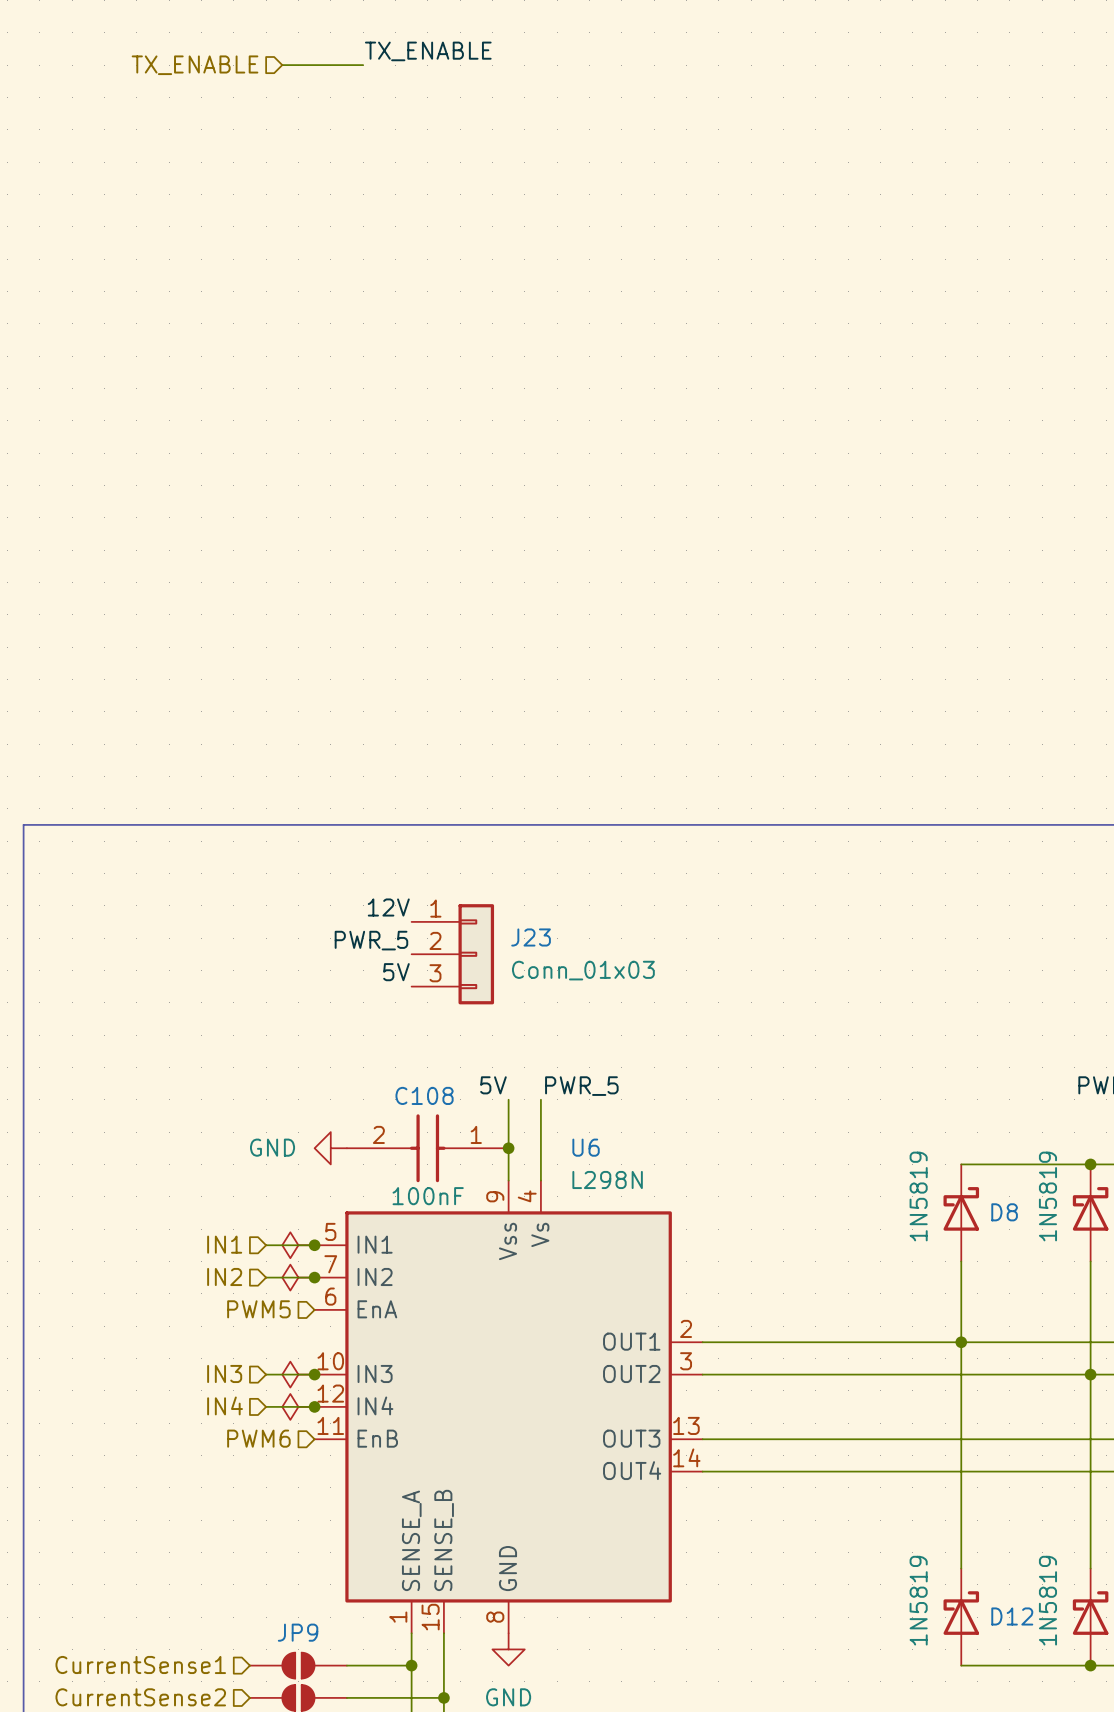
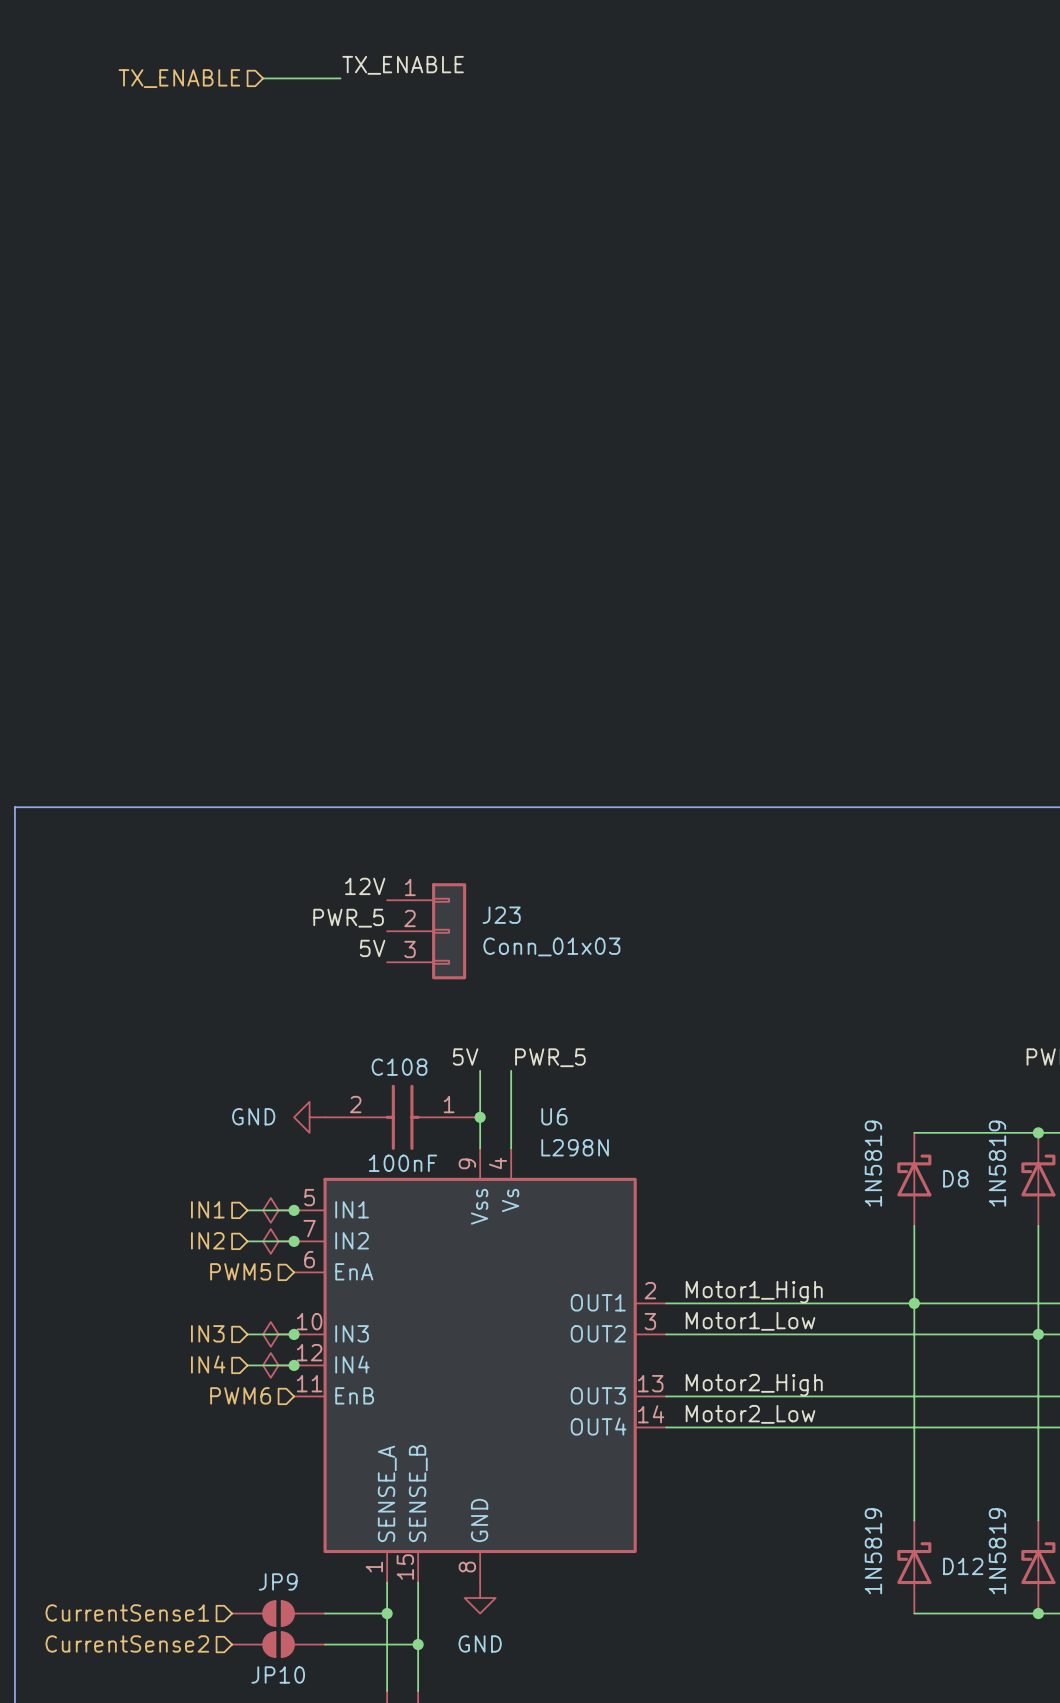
label: none -> Motor1_High (754, 1292)
label: none -> Motor1_Low (750, 1321)
label: none -> Motor2_High (754, 1385)
label: none -> Motor2_Low (750, 1414)

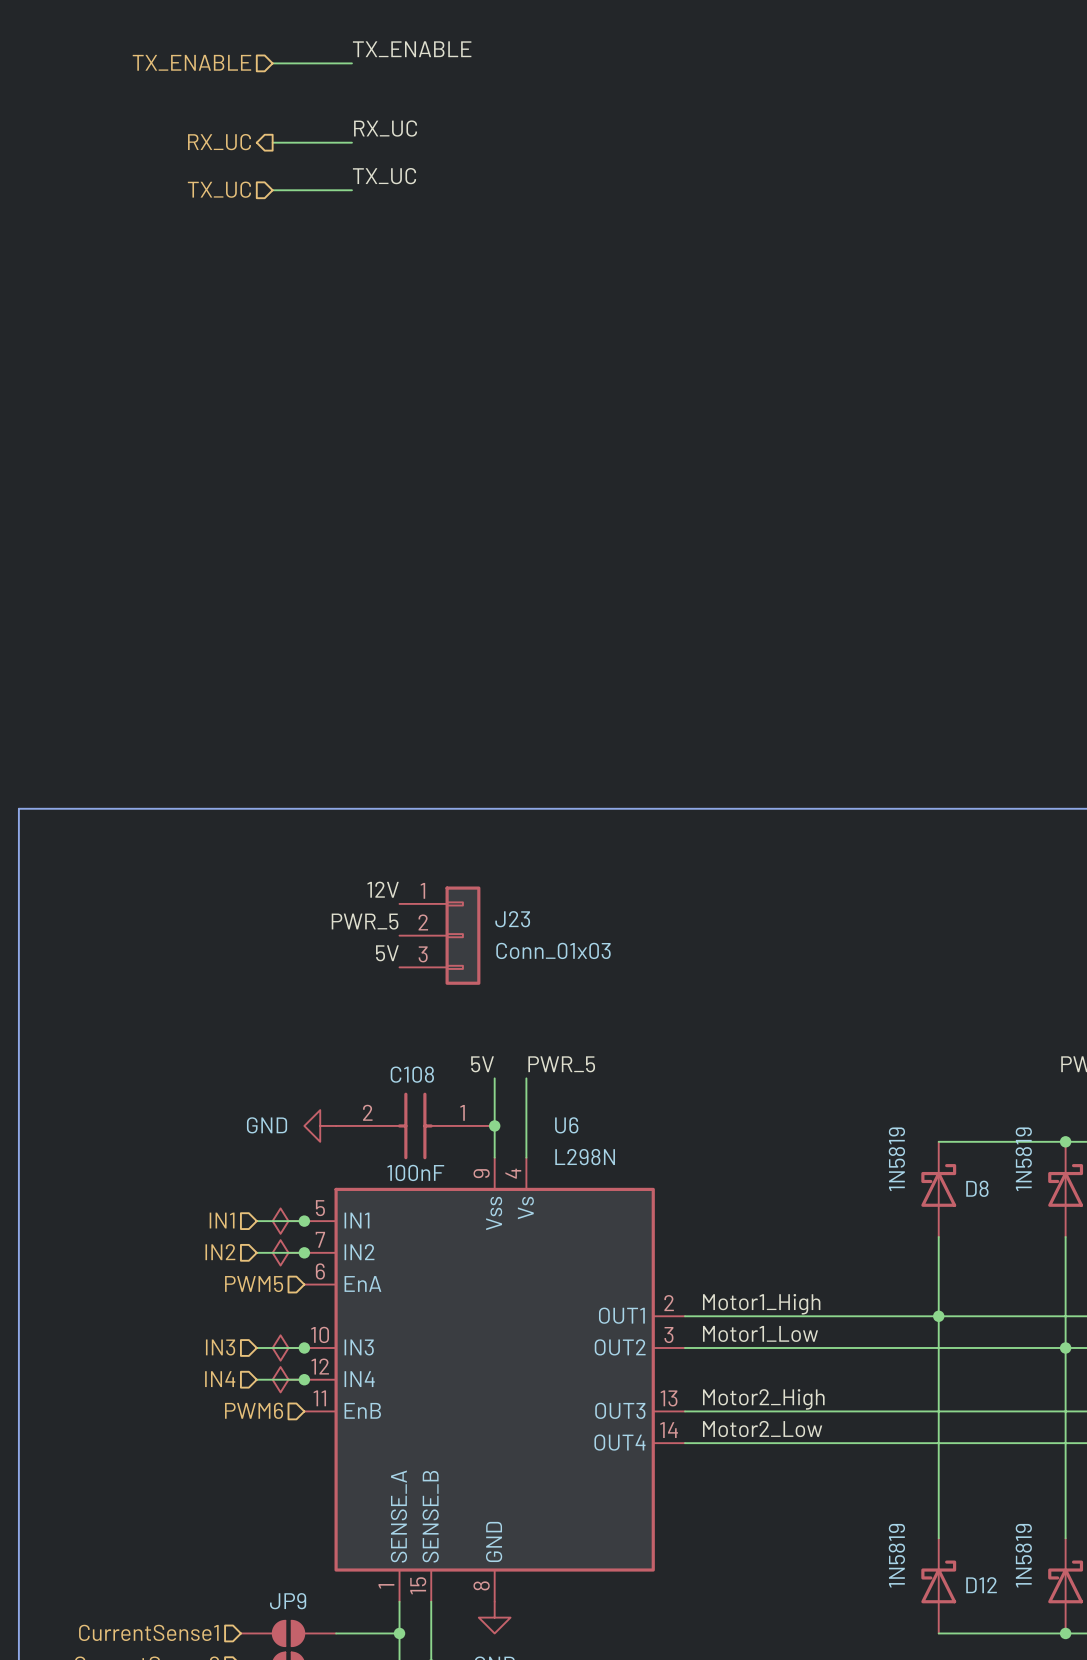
label: none -> RX_UC (385, 128)
wire: none -> (272, 142) (351, 142)
hierarchical label: none -> RX_UC (219, 142)
label: none -> TX_UC (384, 176)
hierarchical label: none -> TX_UC (219, 189)
wire: none -> (272, 190) (351, 190)

